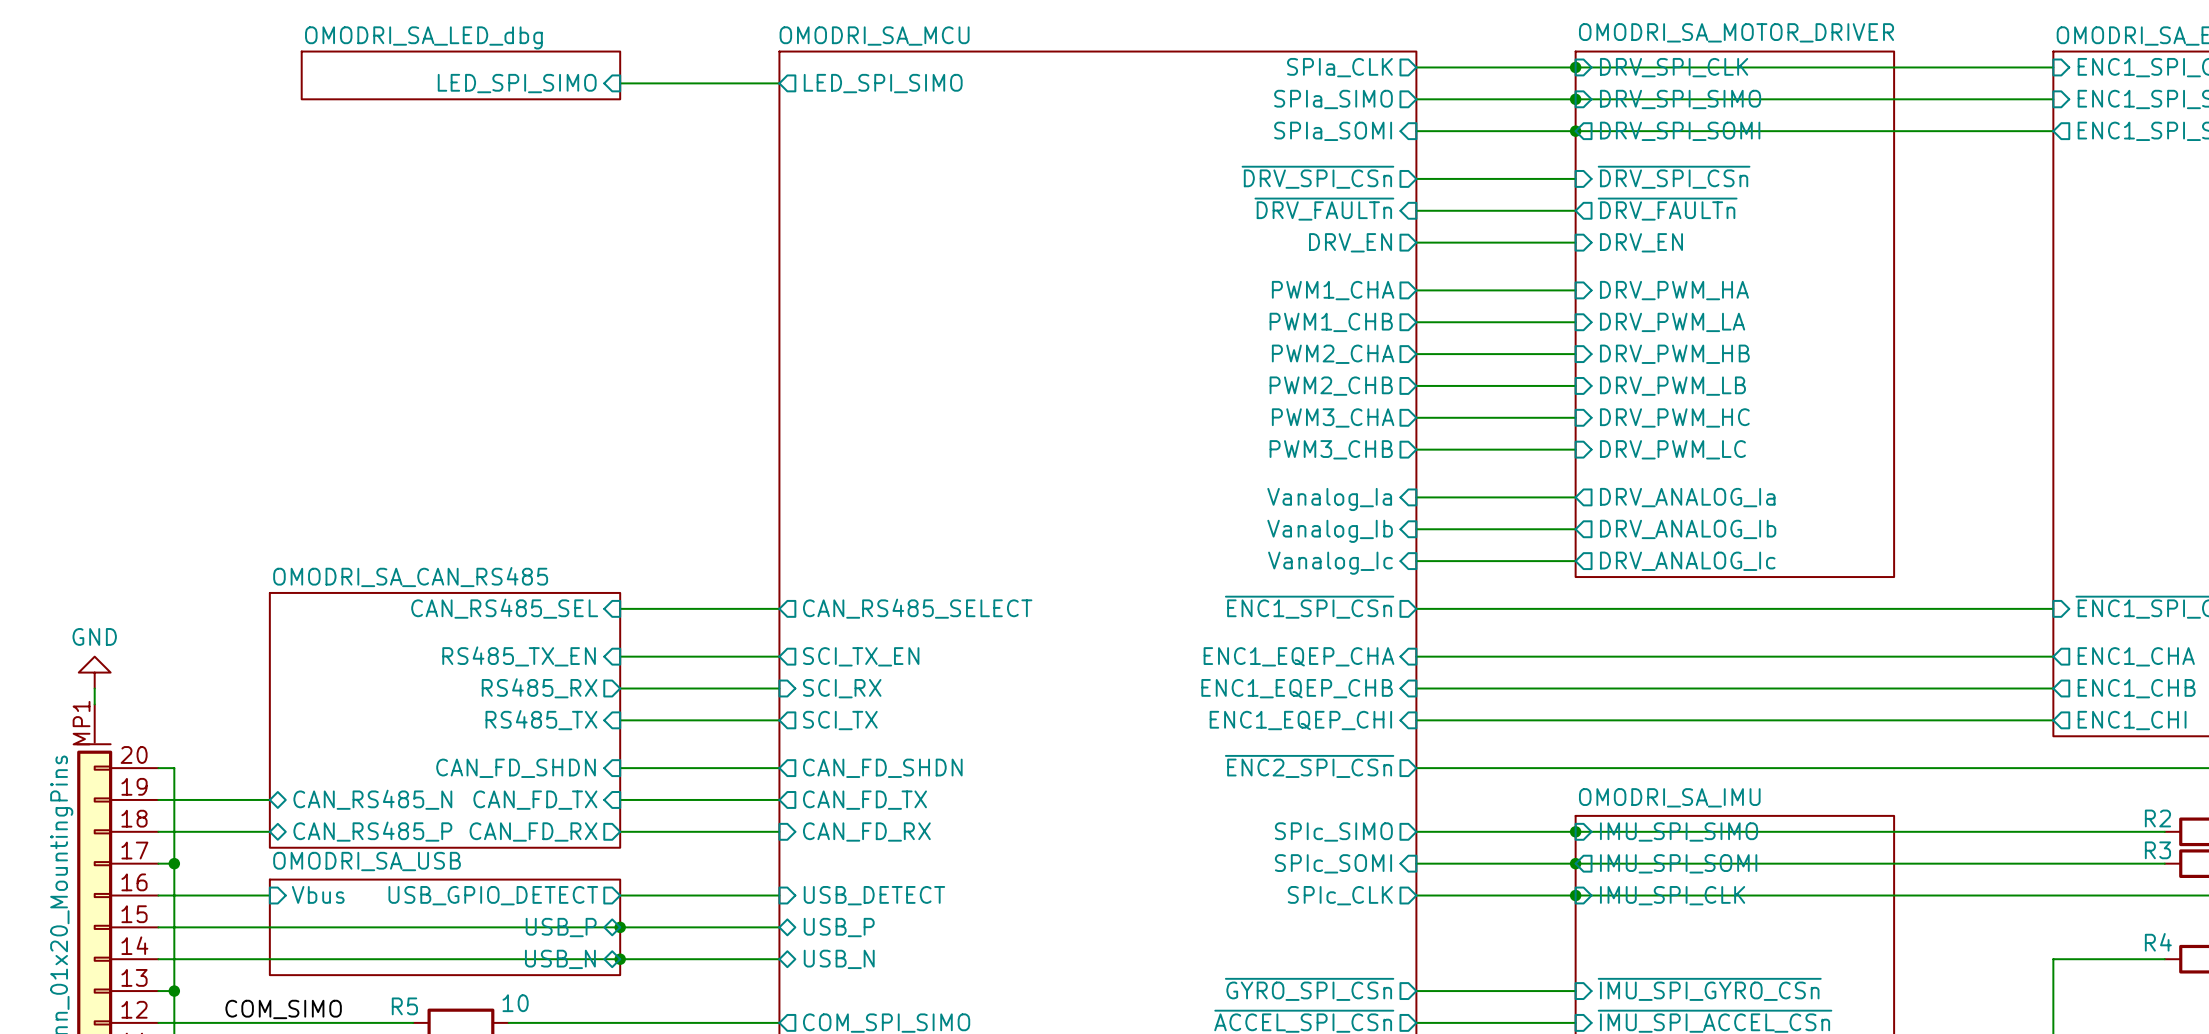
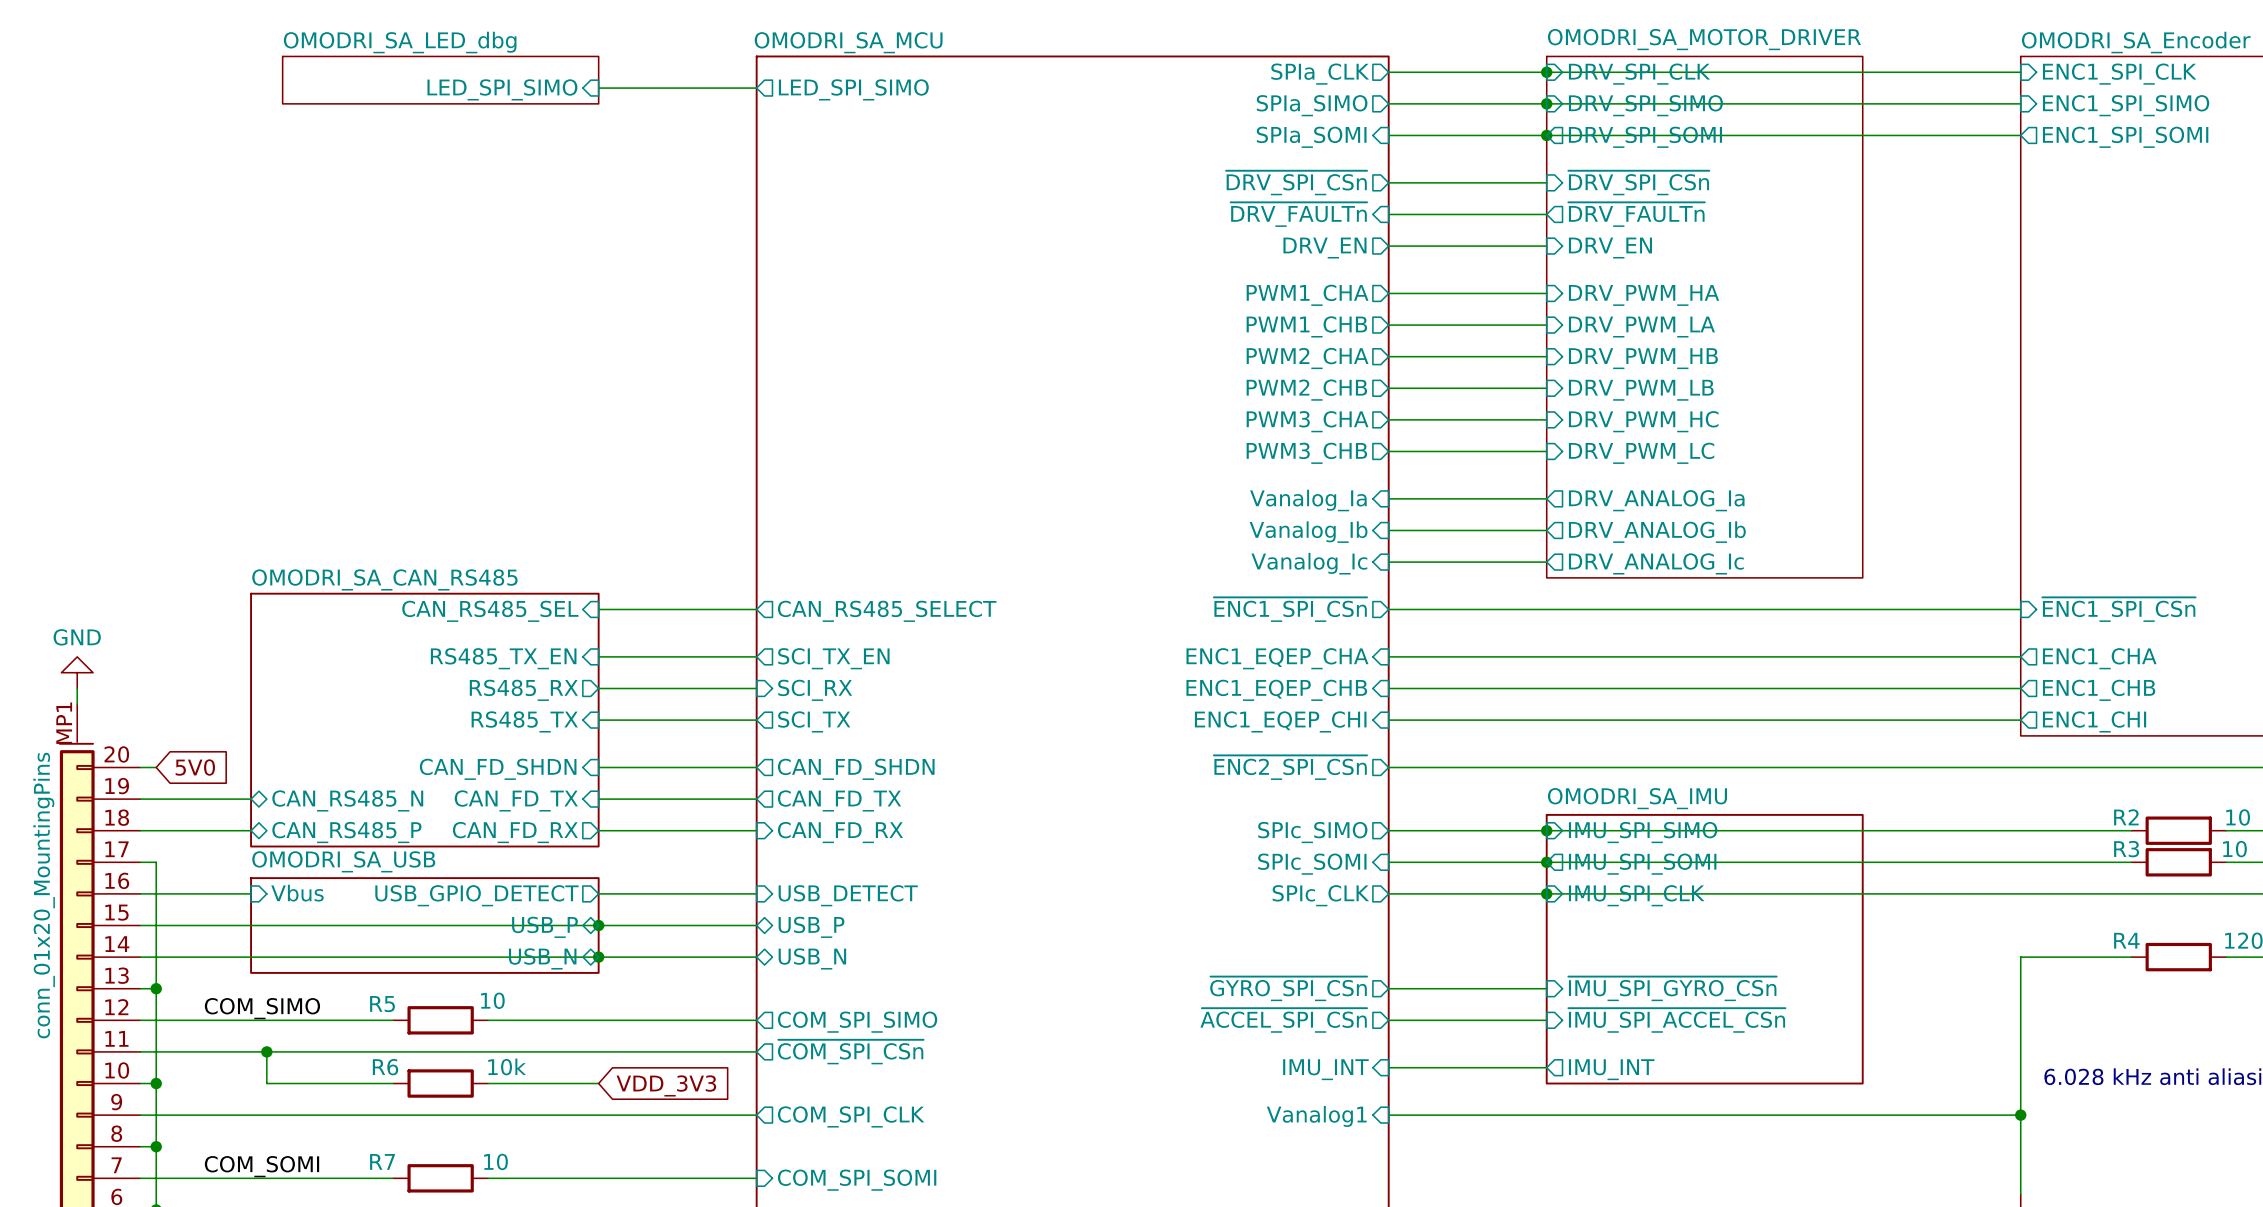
wire: (174, 768) (174, 863) -> none
global label: none -> 5V0 (195, 767)
junction: (174, 863) -> none

